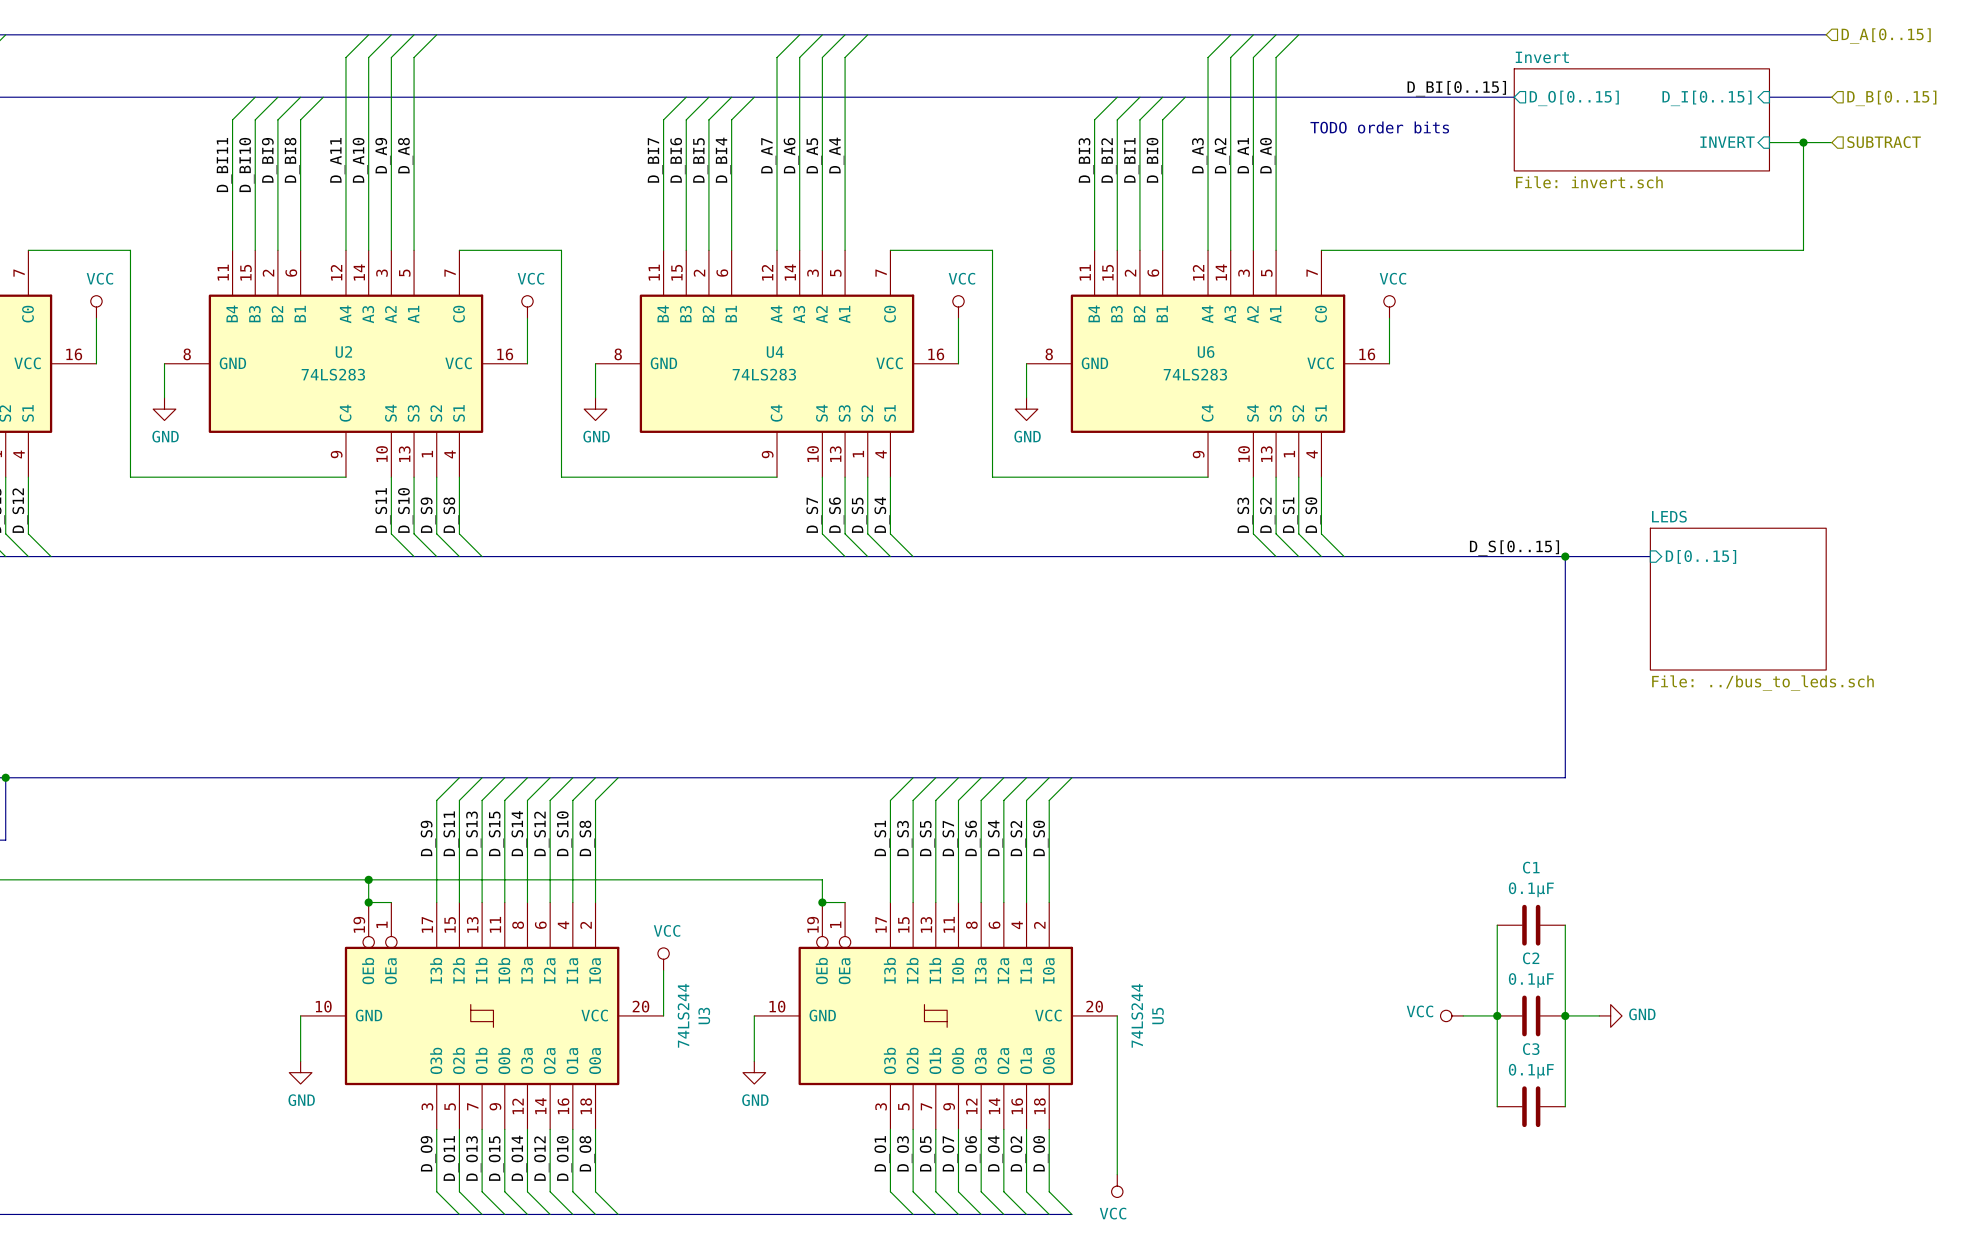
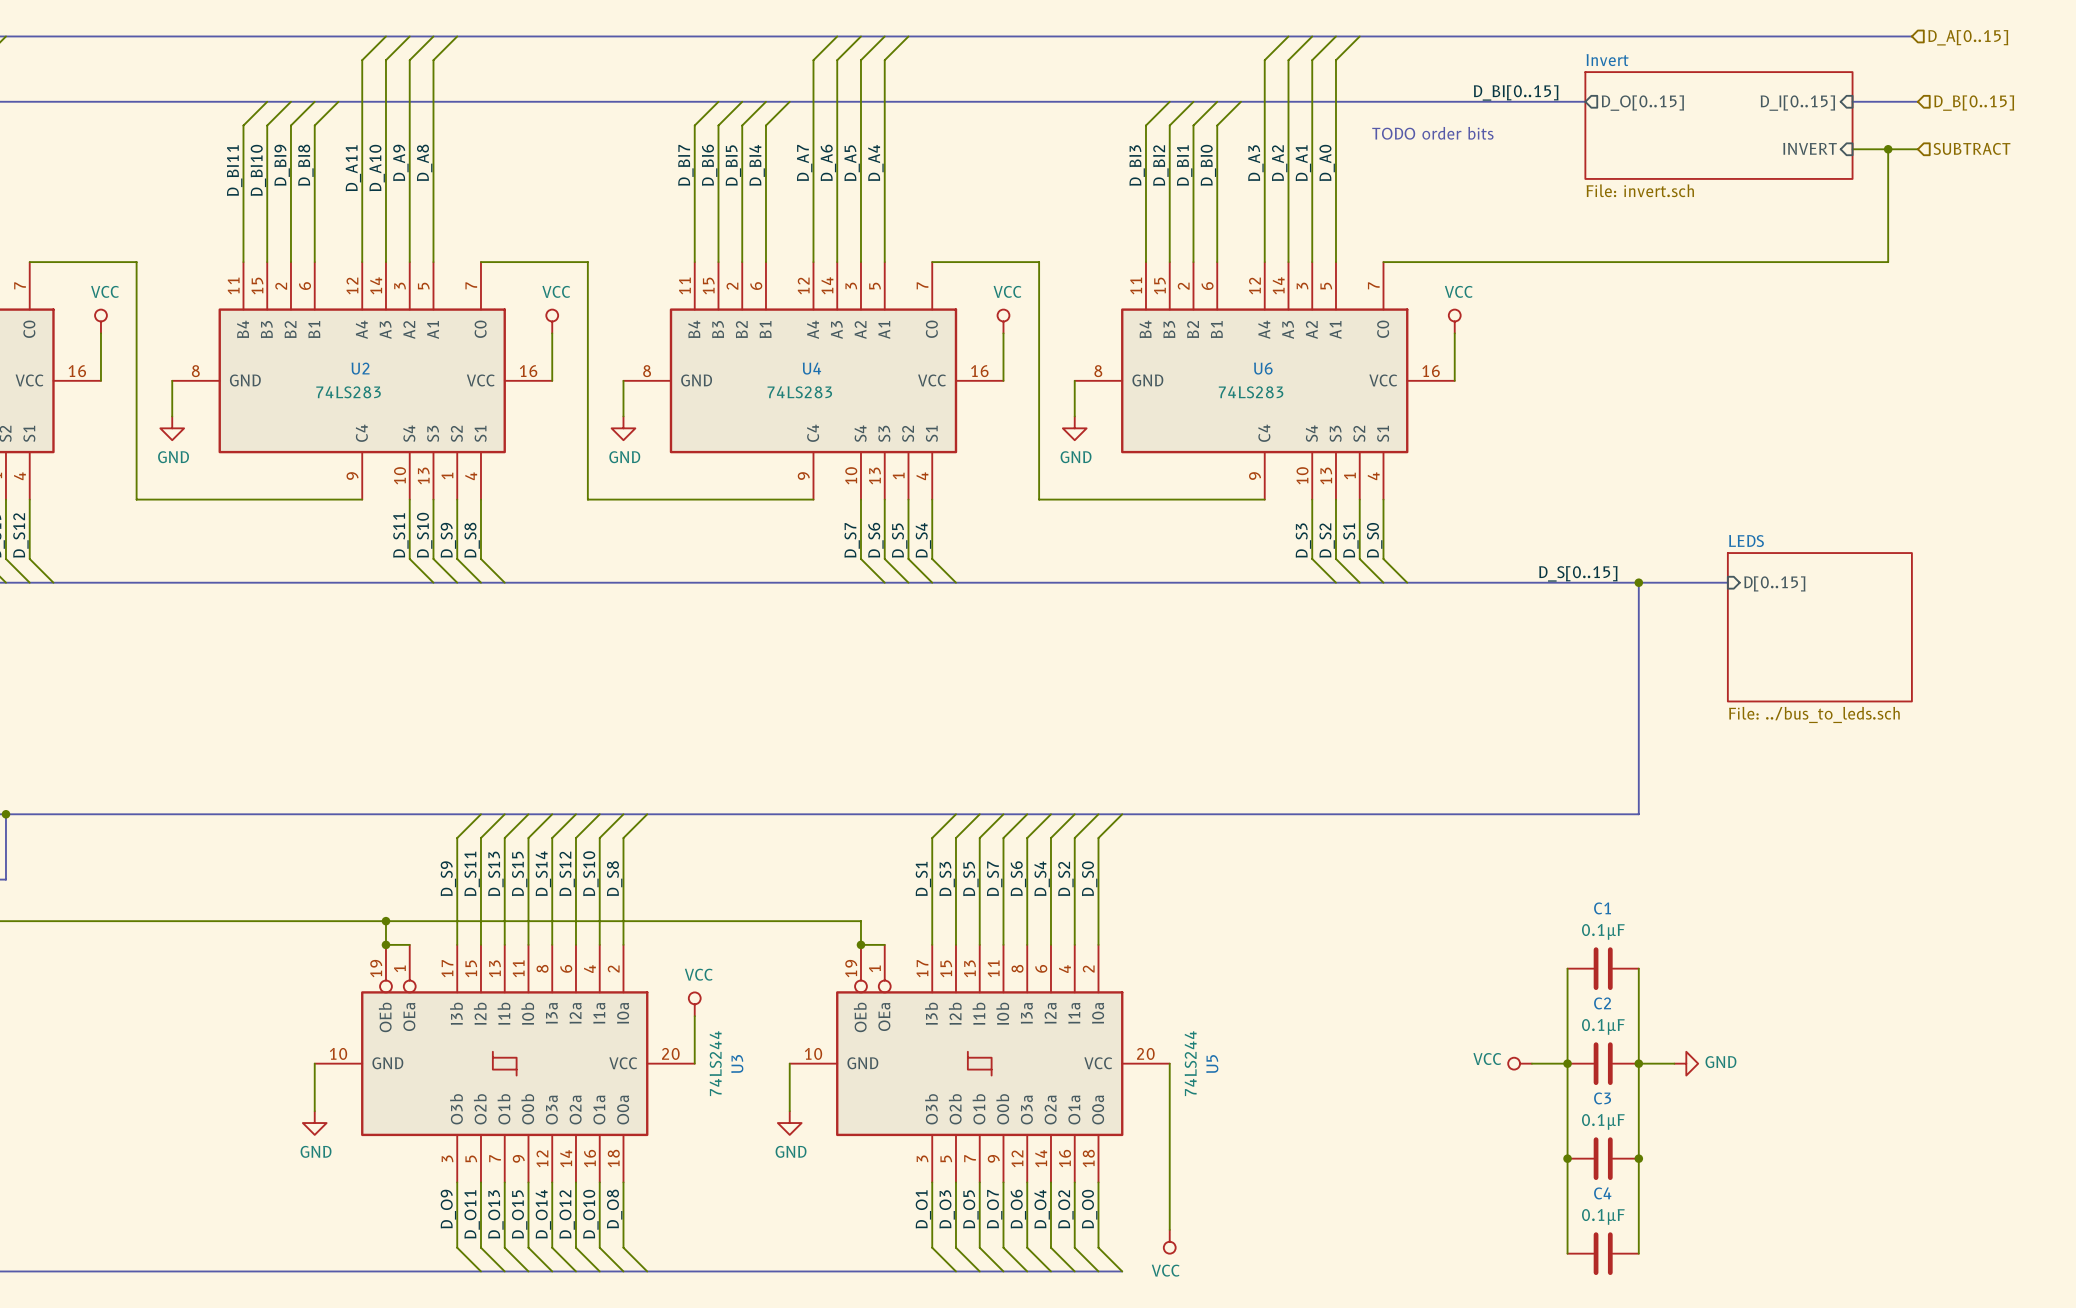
wire: none -> (1567, 1158) (1567, 1253)
junction: none -> (1567, 1158)
wire: none -> (1638, 1158) (1638, 1253)
junction: none -> (1638, 1158)
C4: none -> 0.1µF (1603, 1253)

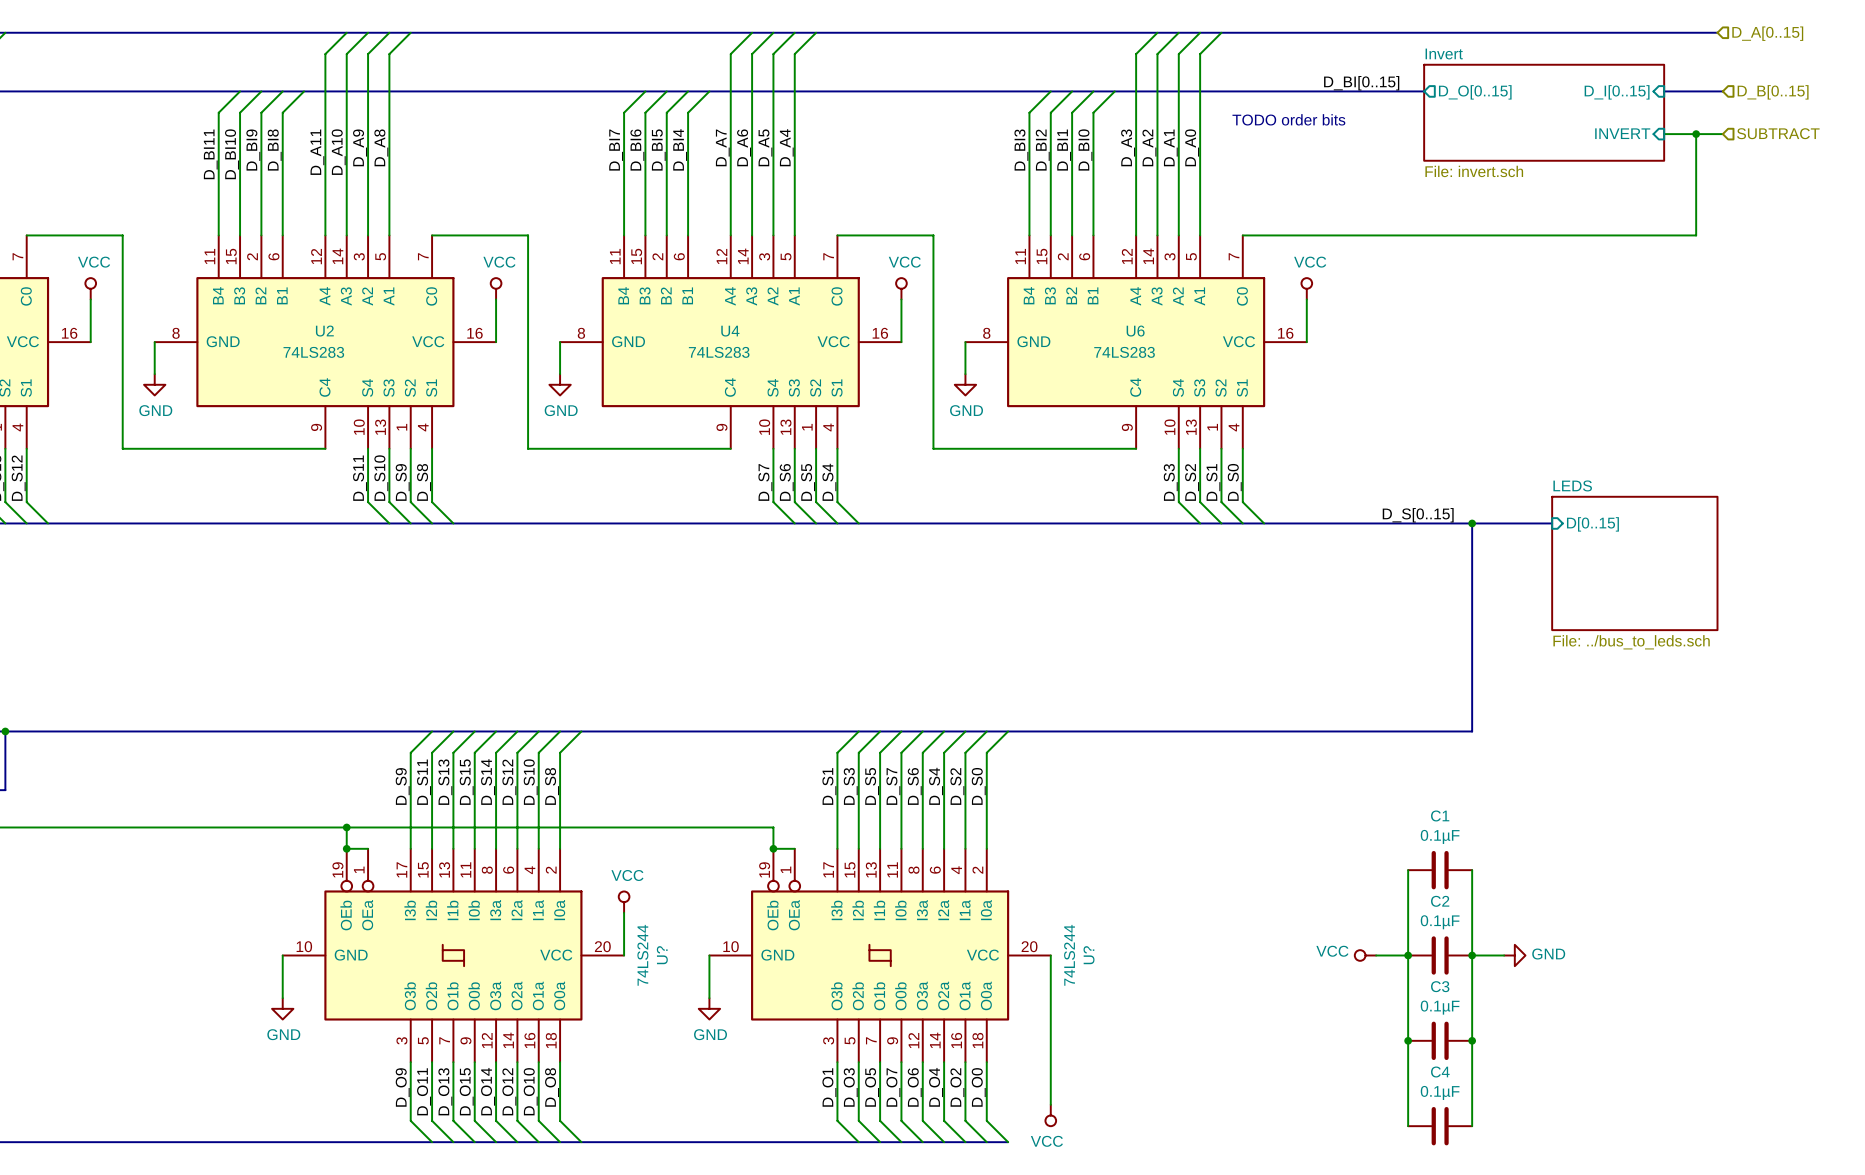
U3 name: U3 (737, 1064) -> U? (662, 955)
U5 name: U5 (1212, 1064) -> U? (1089, 955)

